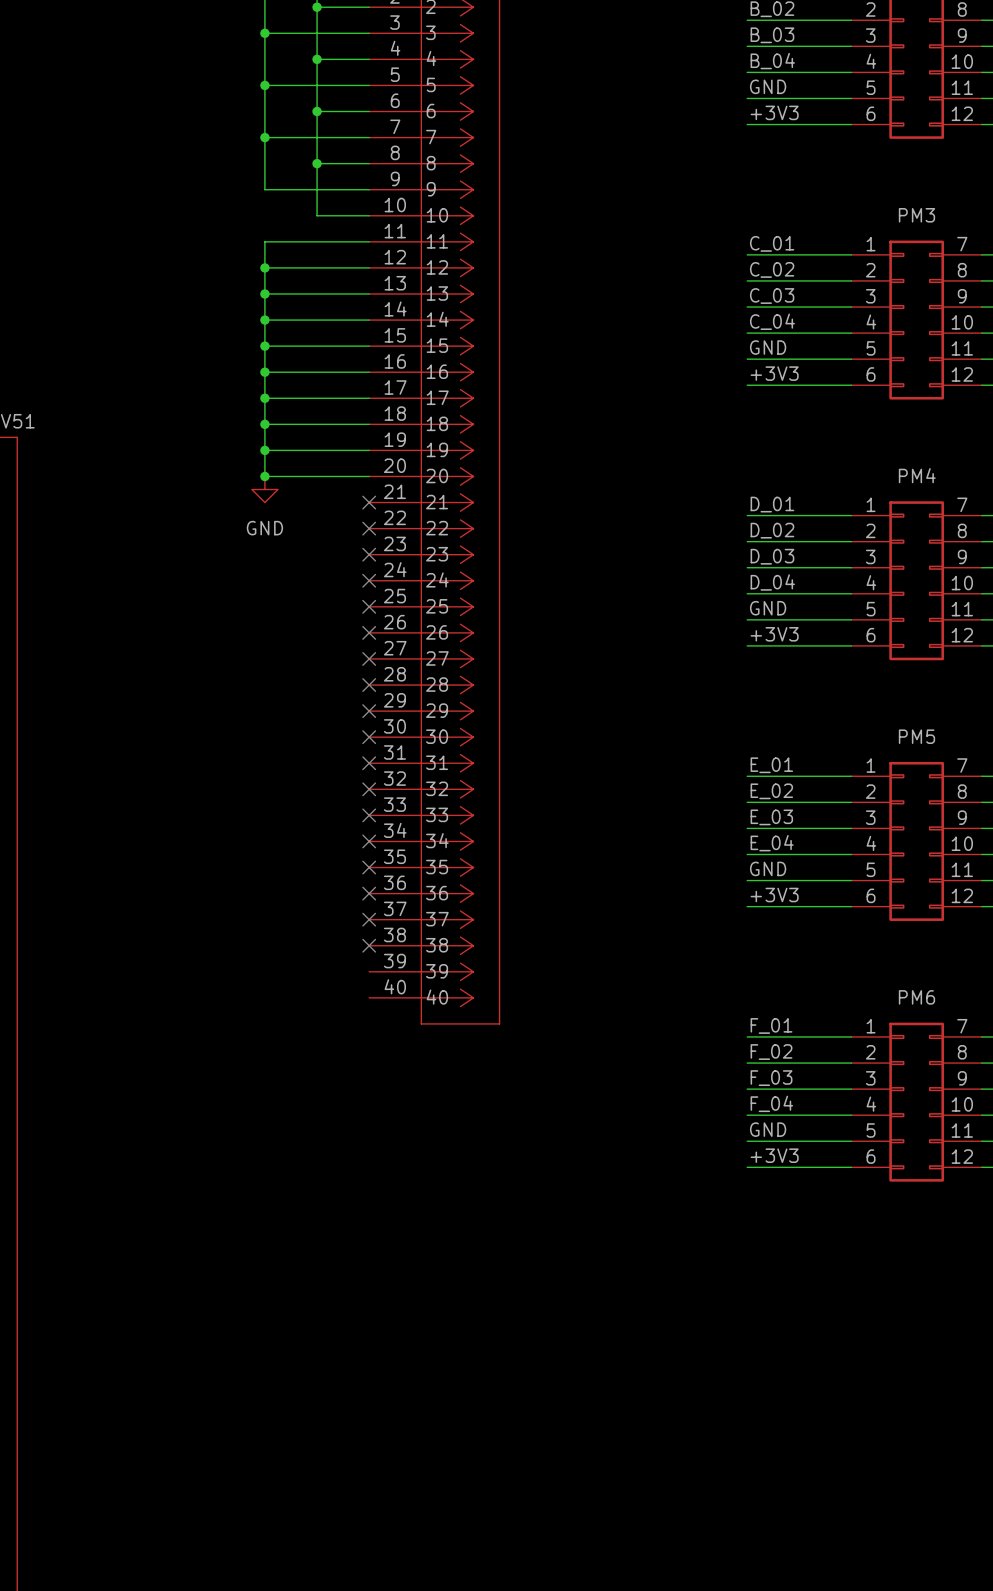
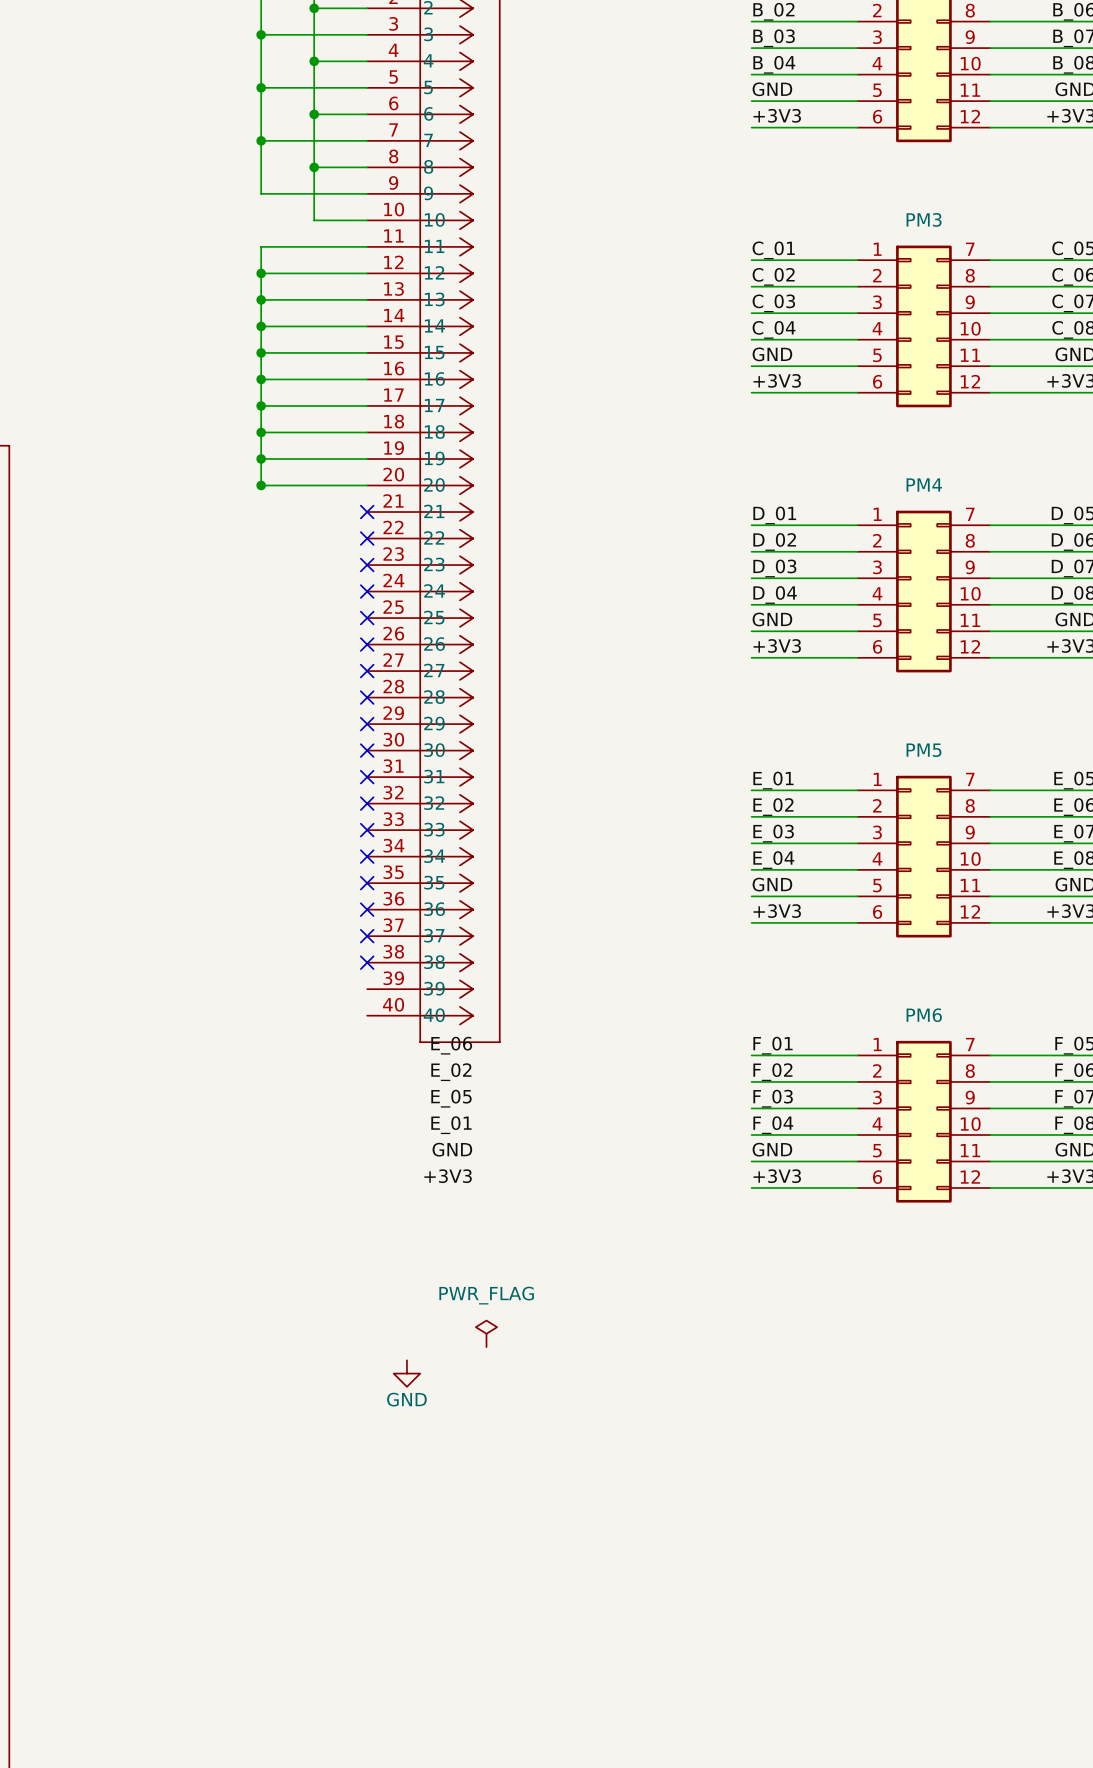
power symbol: GND (264, 489) -> none
label: none -> E_06 (451, 1045)
label: none -> E_02 (451, 1072)
label: none -> E_05 (451, 1098)
label: none -> E_01 (451, 1125)
label: none -> GND (452, 1149)
label: none -> +3V3 (448, 1176)
power symbol: none -> PWR_FLAG (486, 1333)
power symbol: none -> GND (406, 1373)

